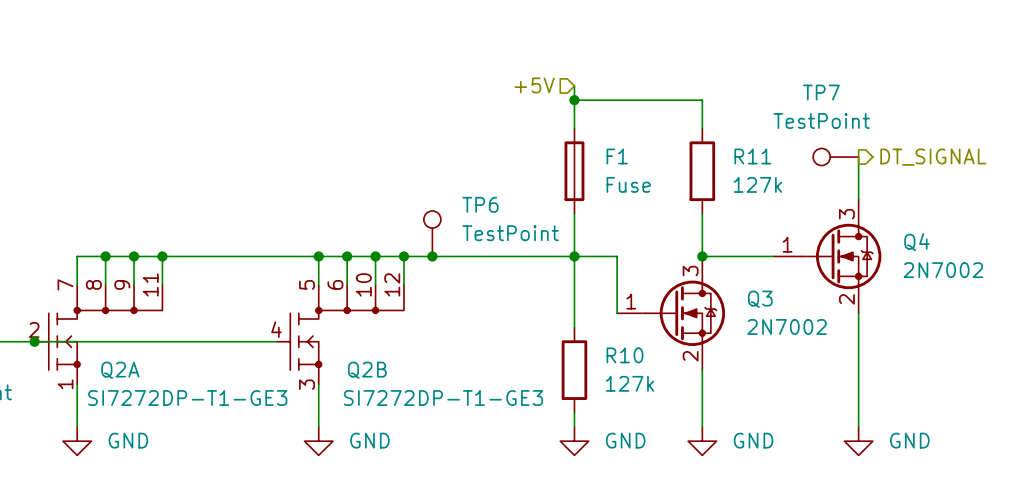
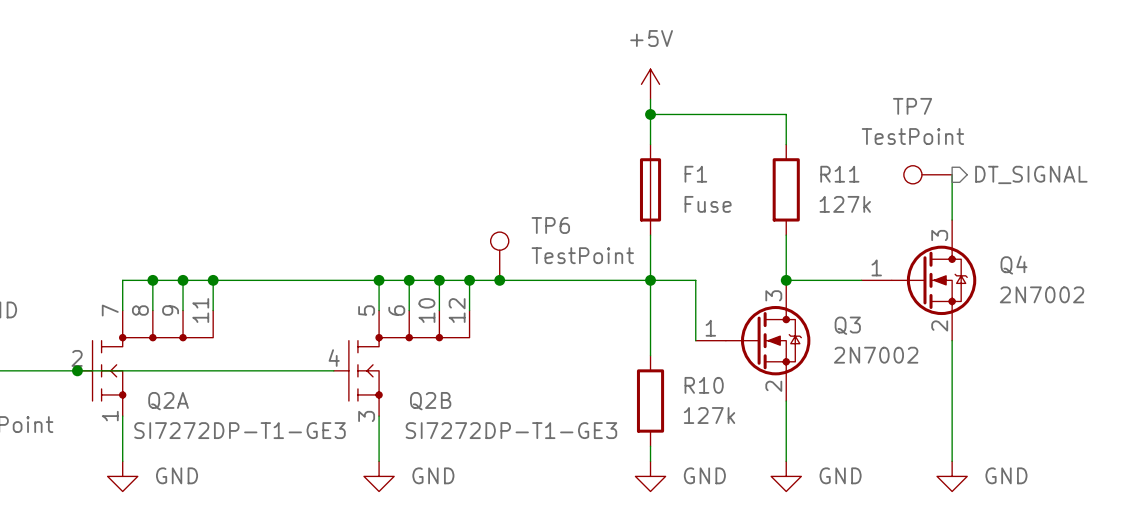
power symbol: none -> +5V (650, 84)
hierarchical label: +5V (534, 85) -> none

